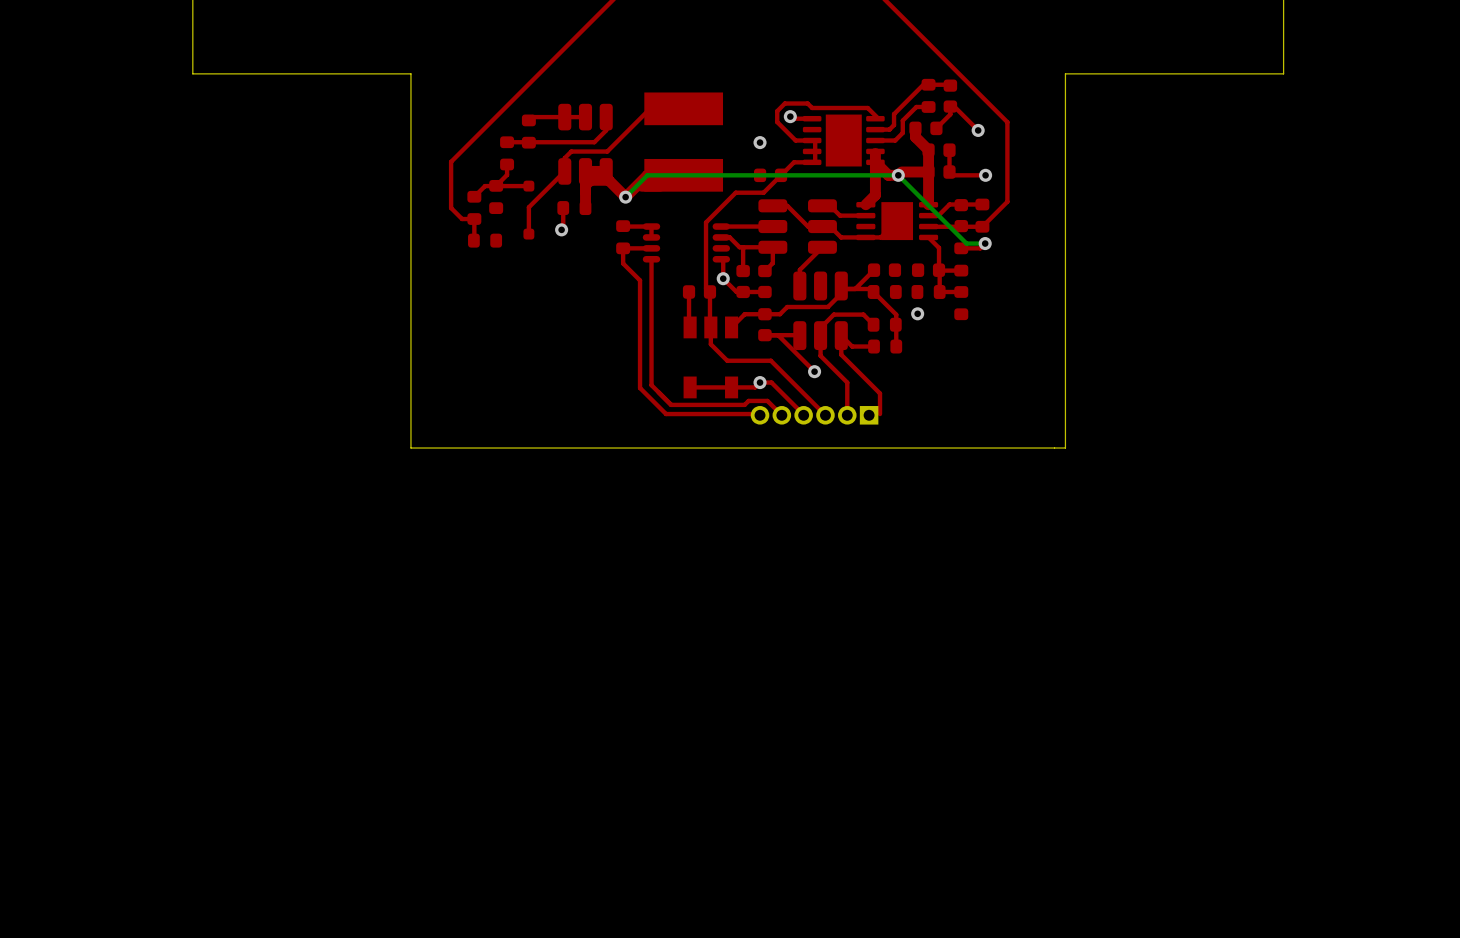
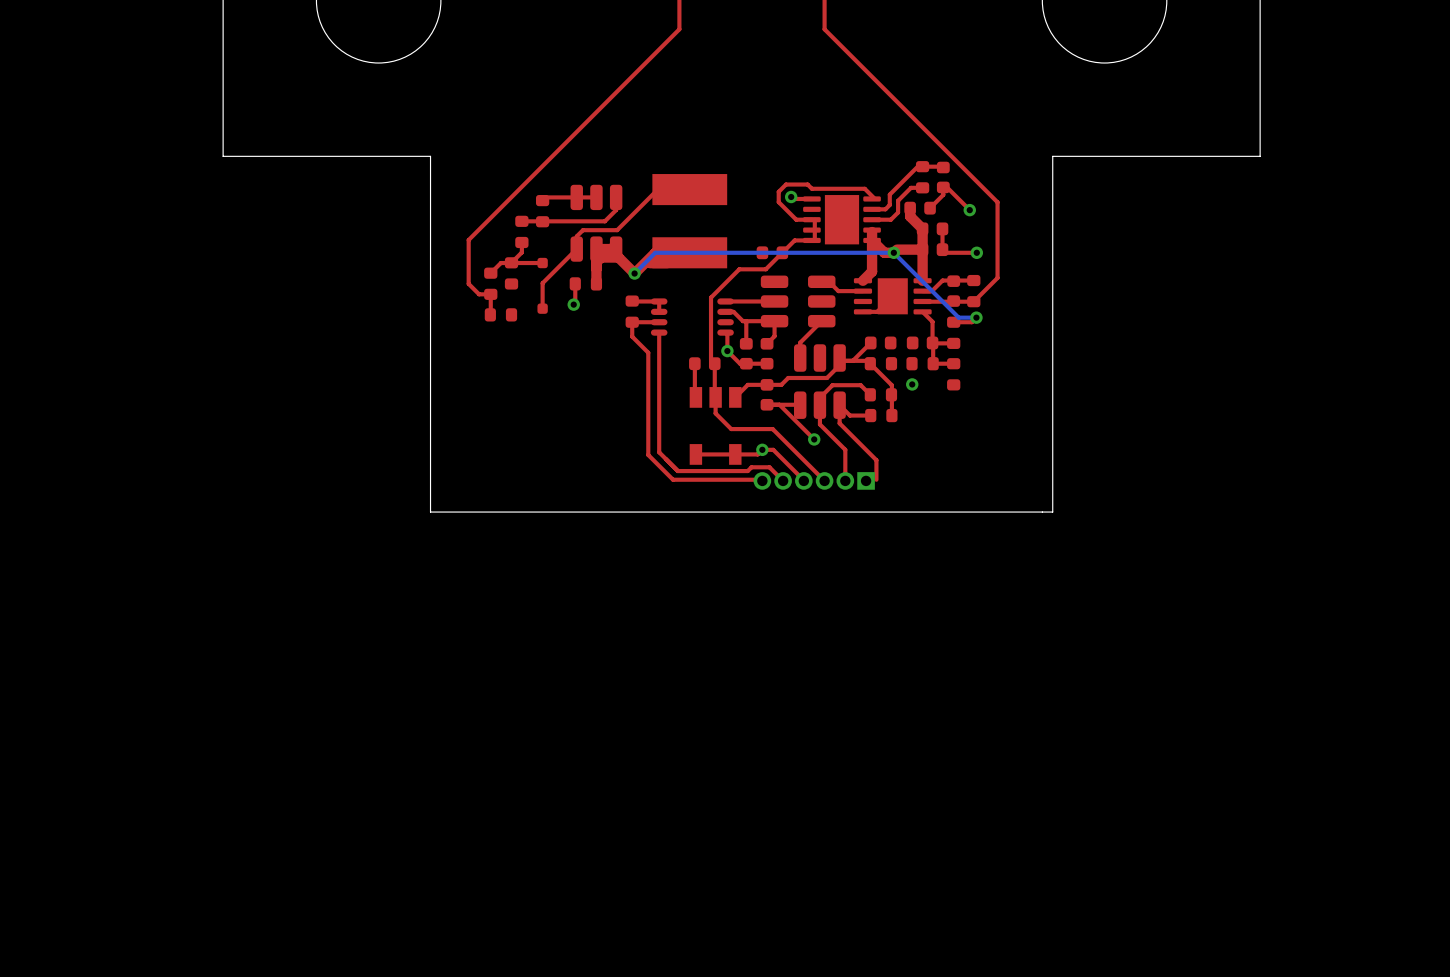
via: (760, 142) -> none
top track: (772, 205) (787, 205) (808, 226) (830, 226) (841, 237) (865, 237) -> none

